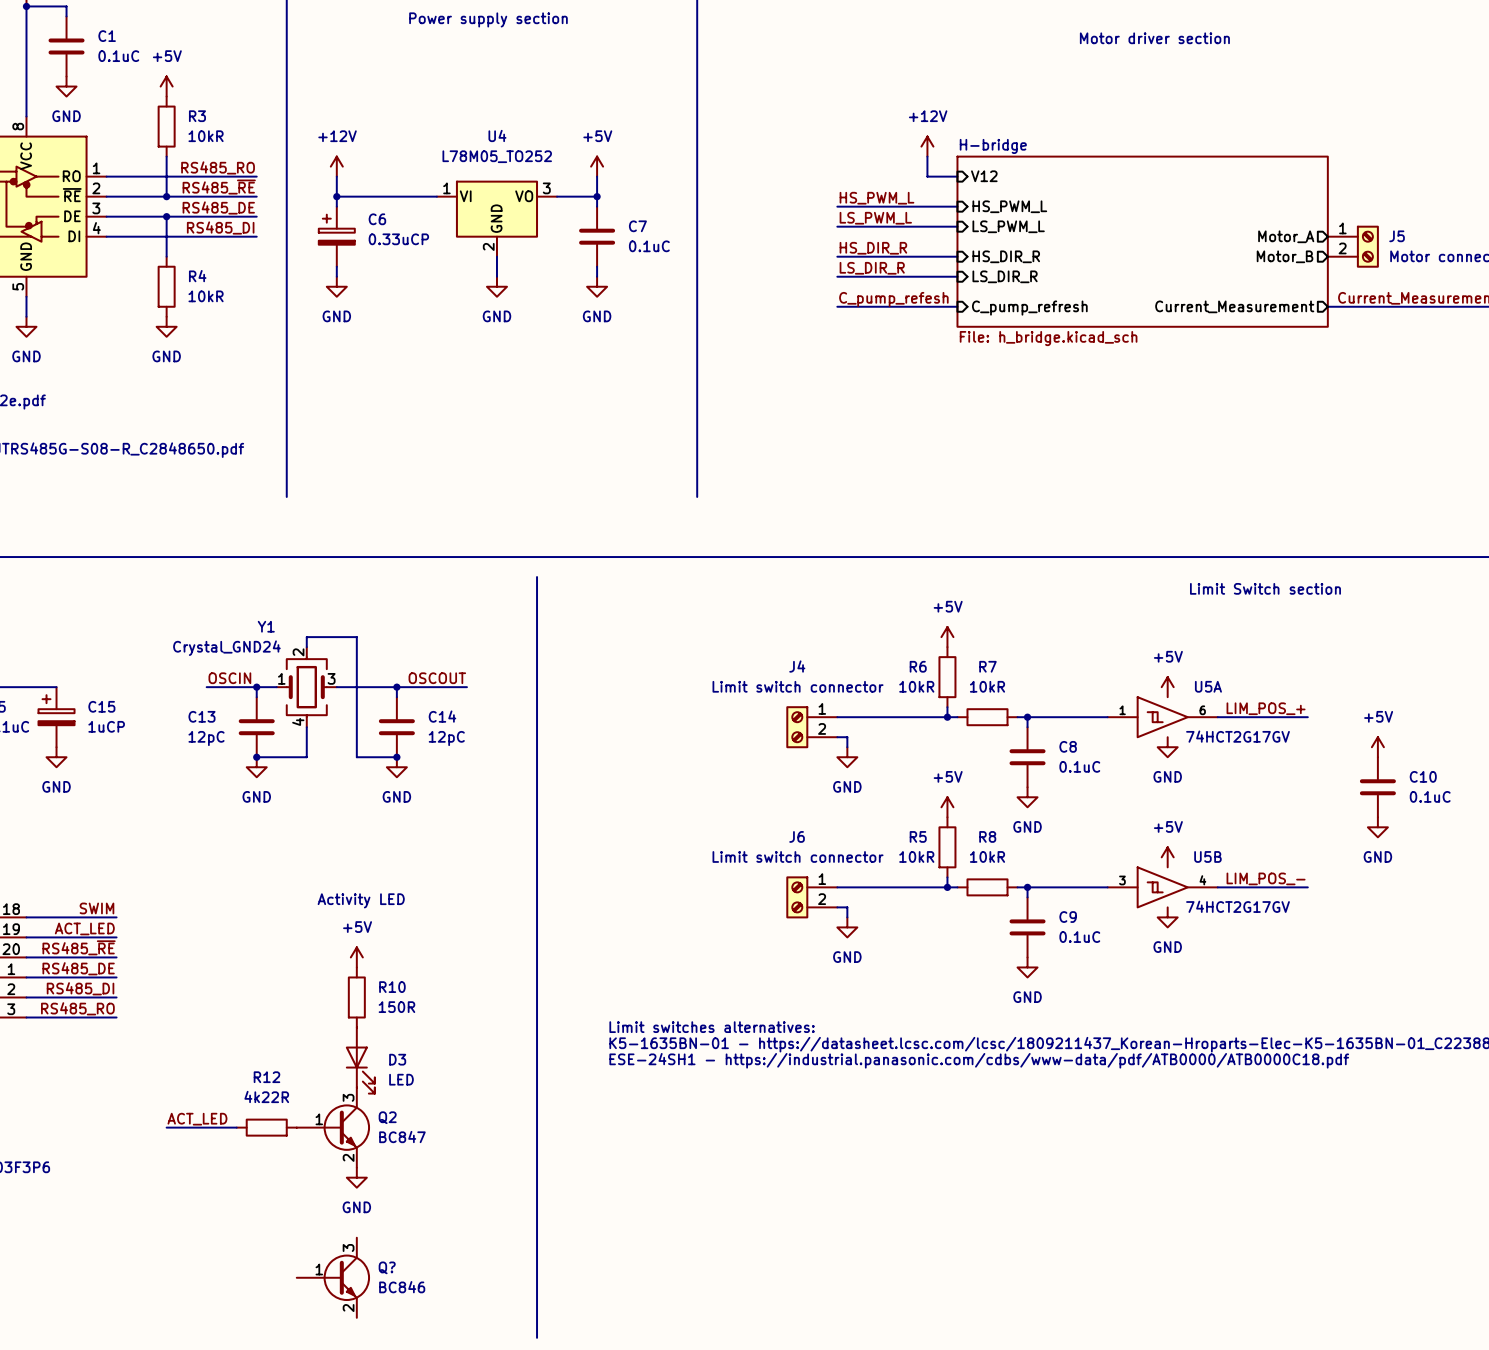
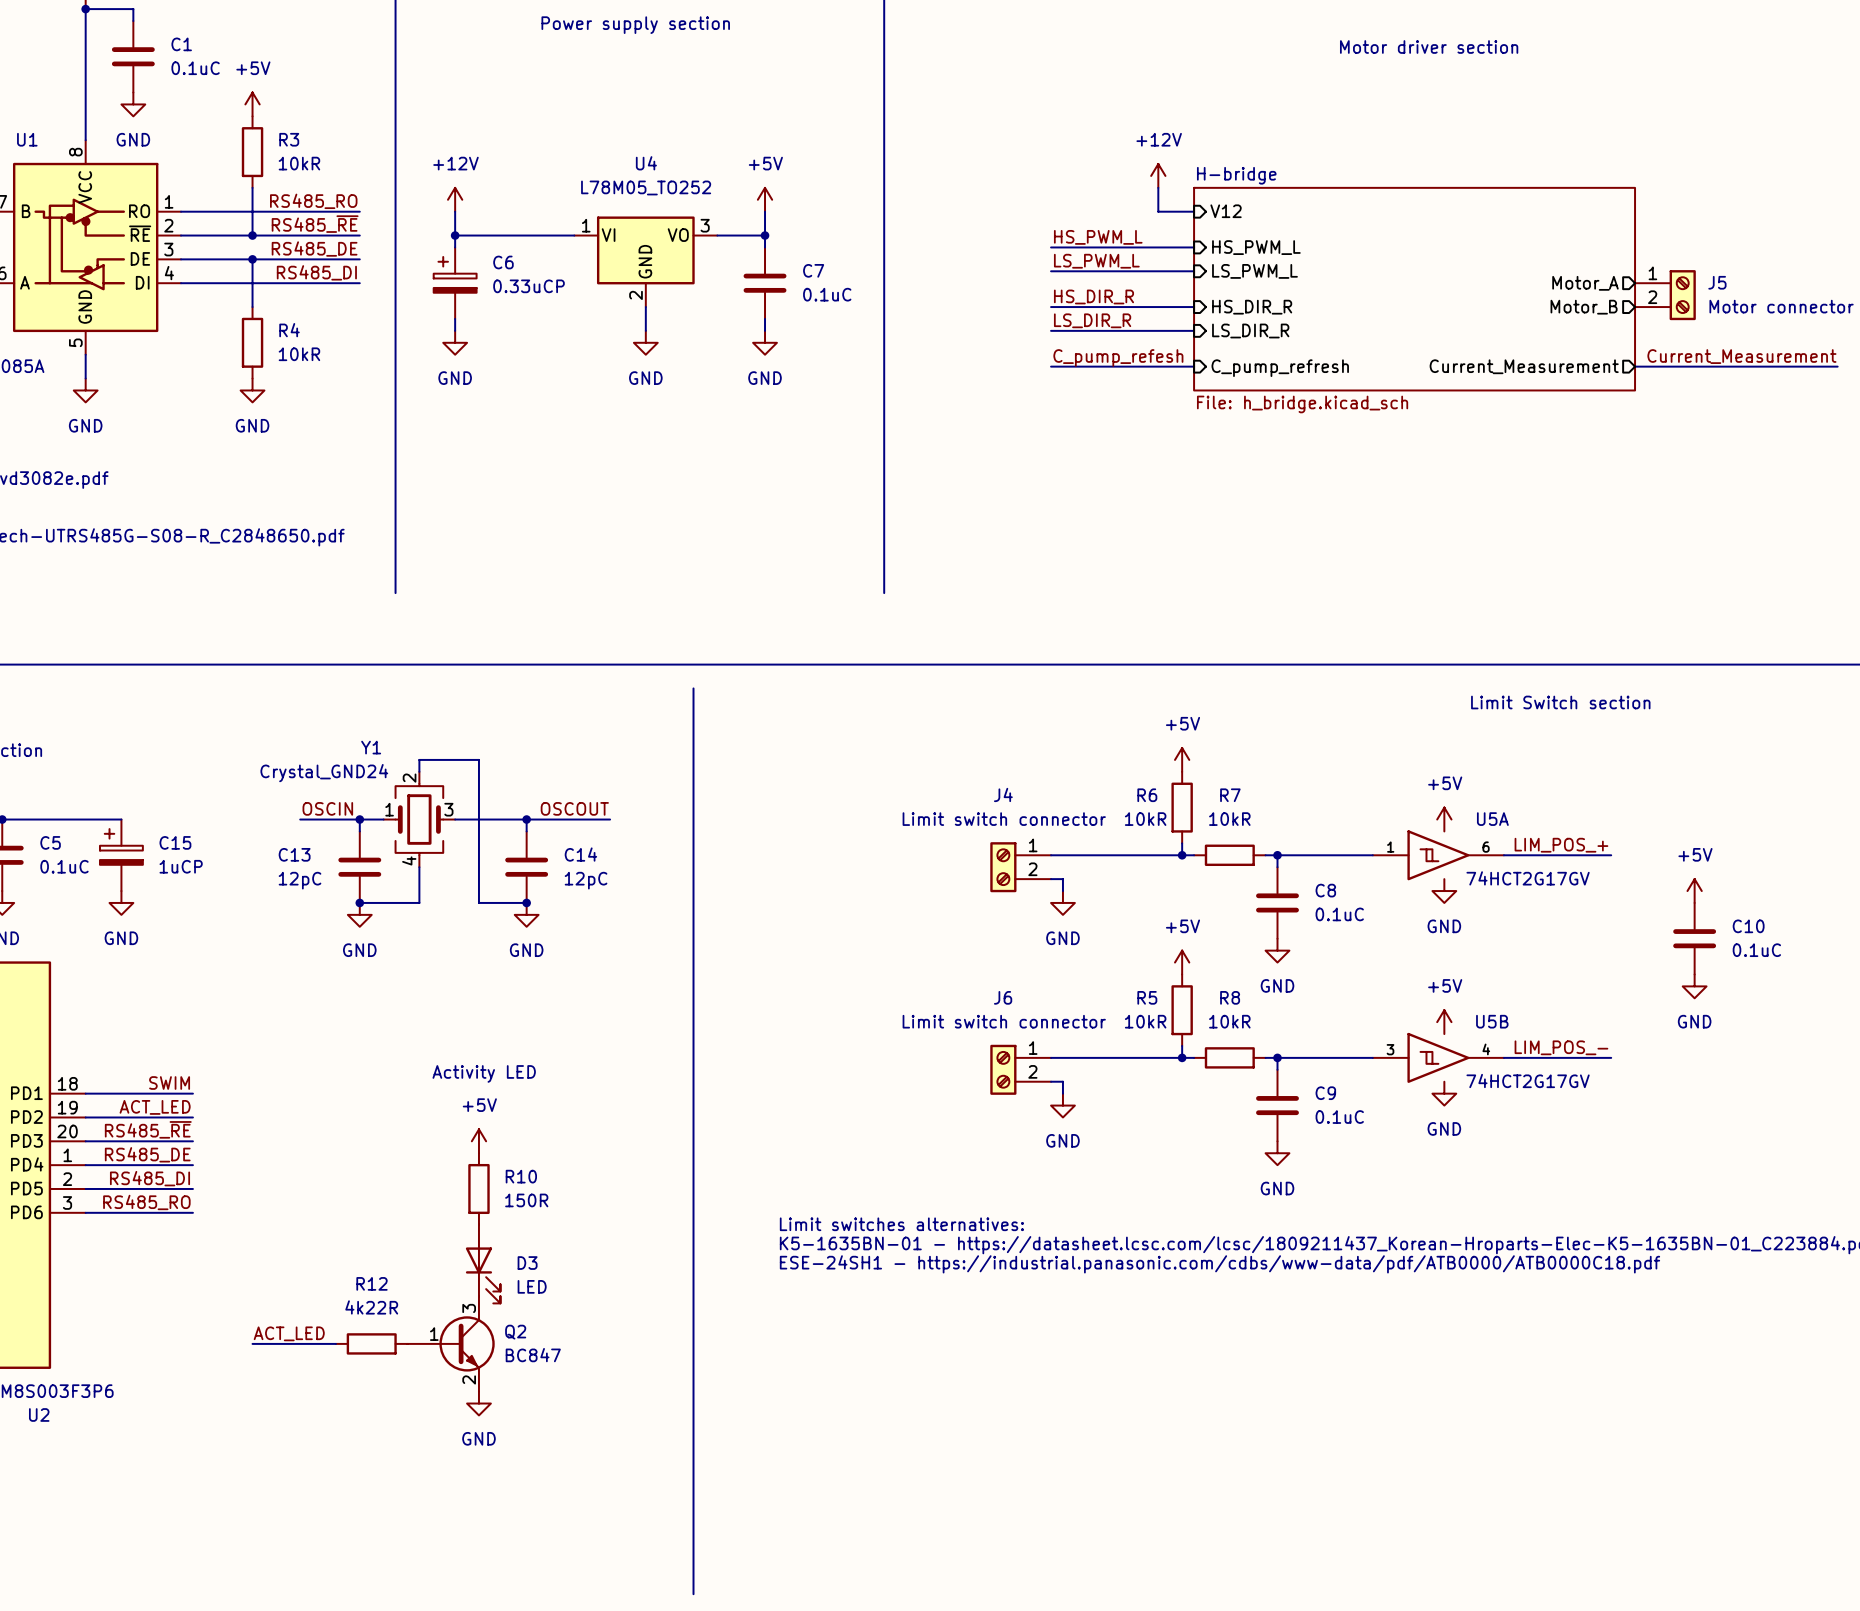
Q?: BC846 (333, 1277) -> none

